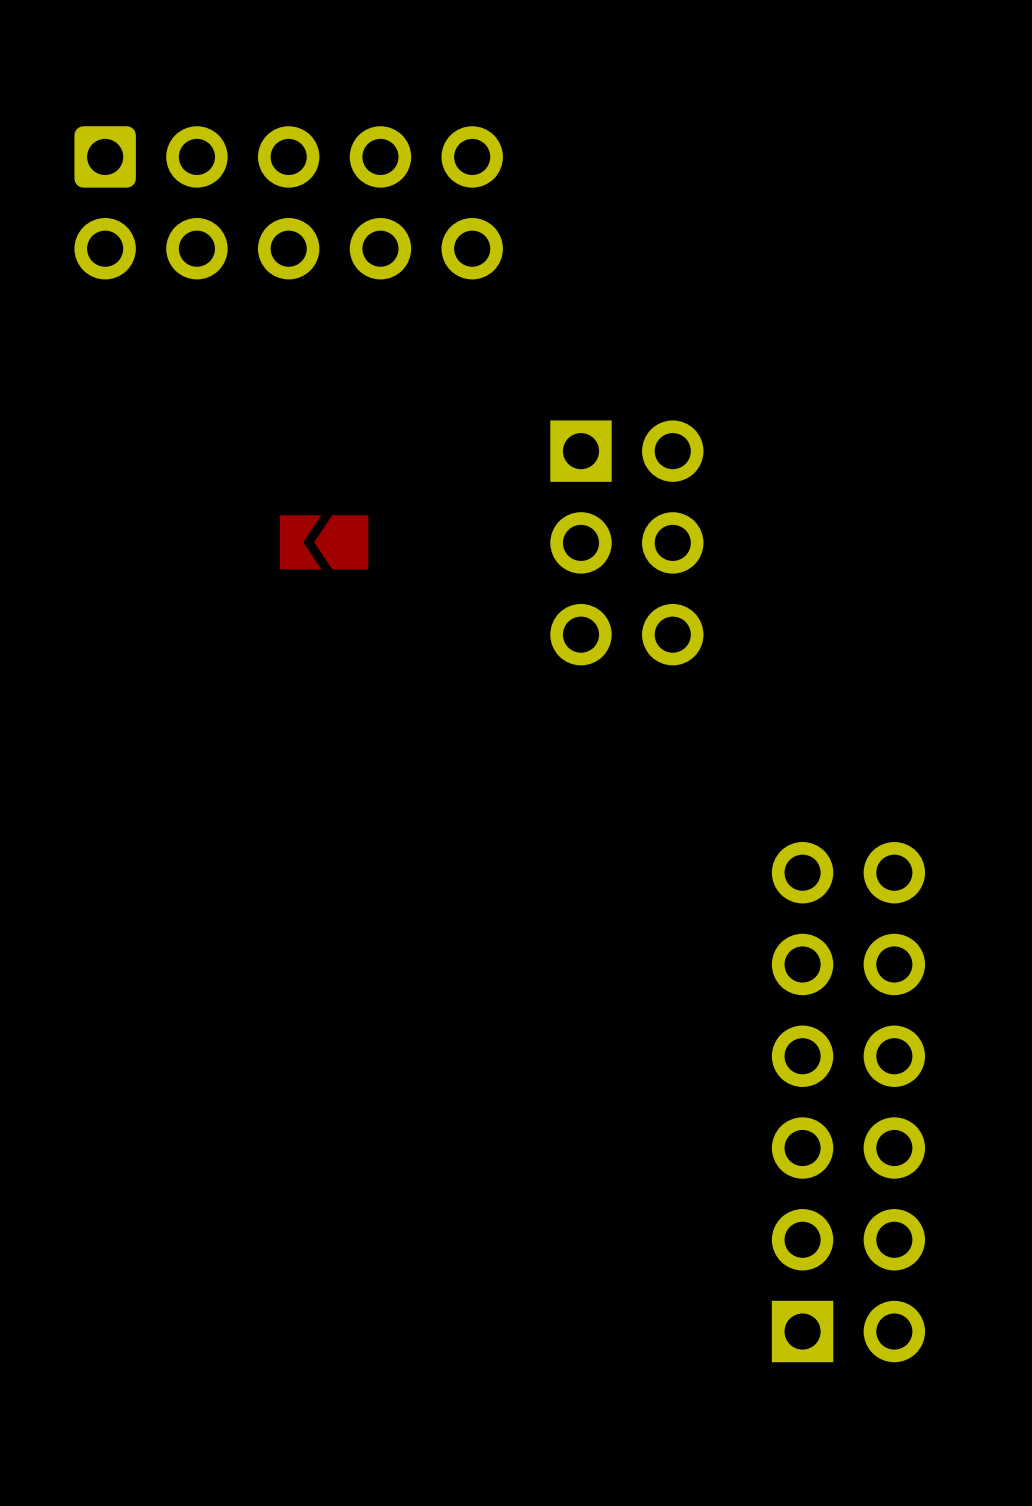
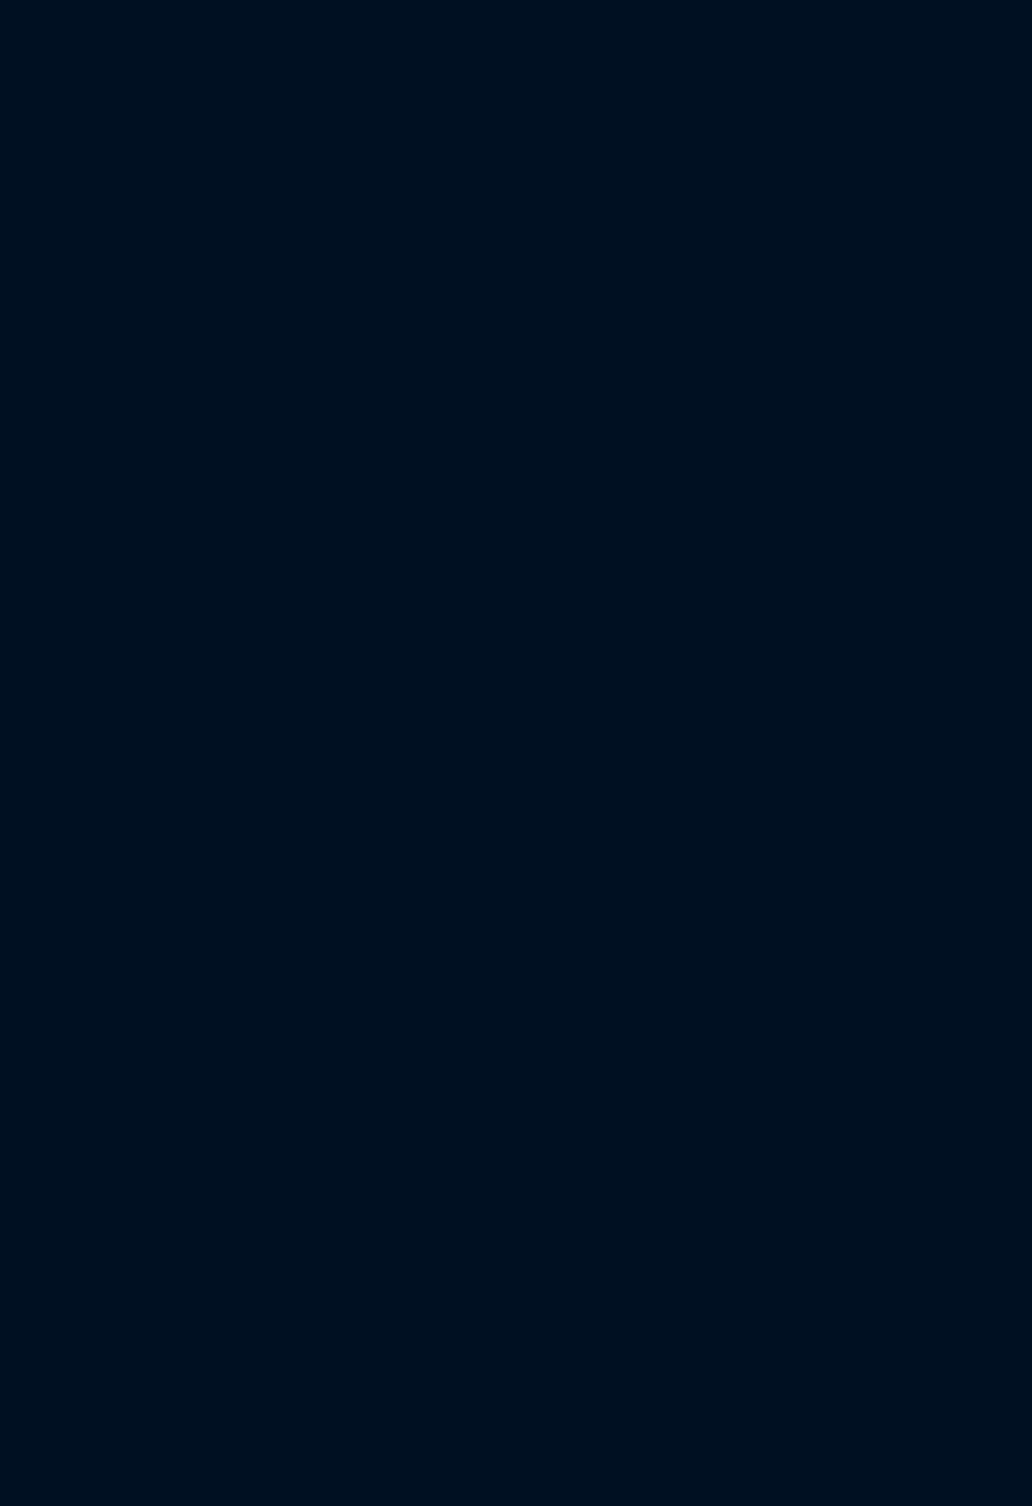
part: (288, 202) -> none
part: (324, 542) -> none
part: (626, 542) -> none
part: (848, 1102) -> none

